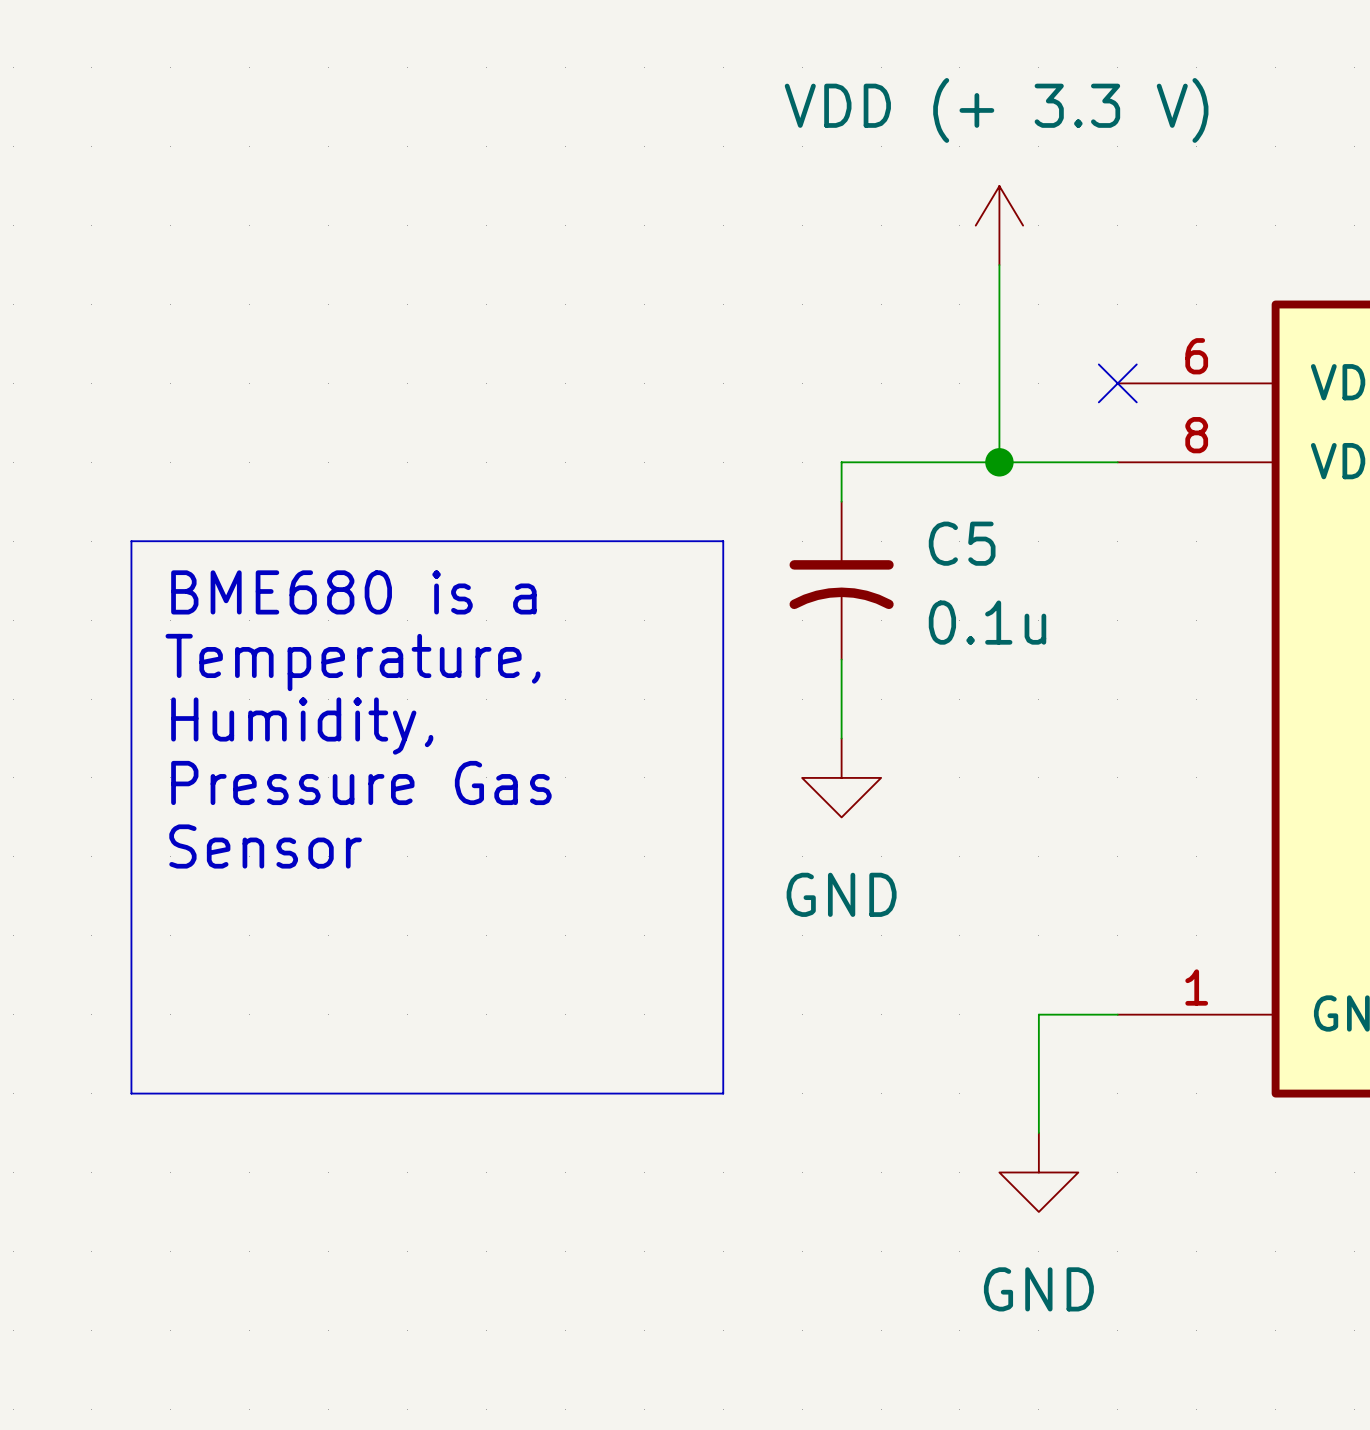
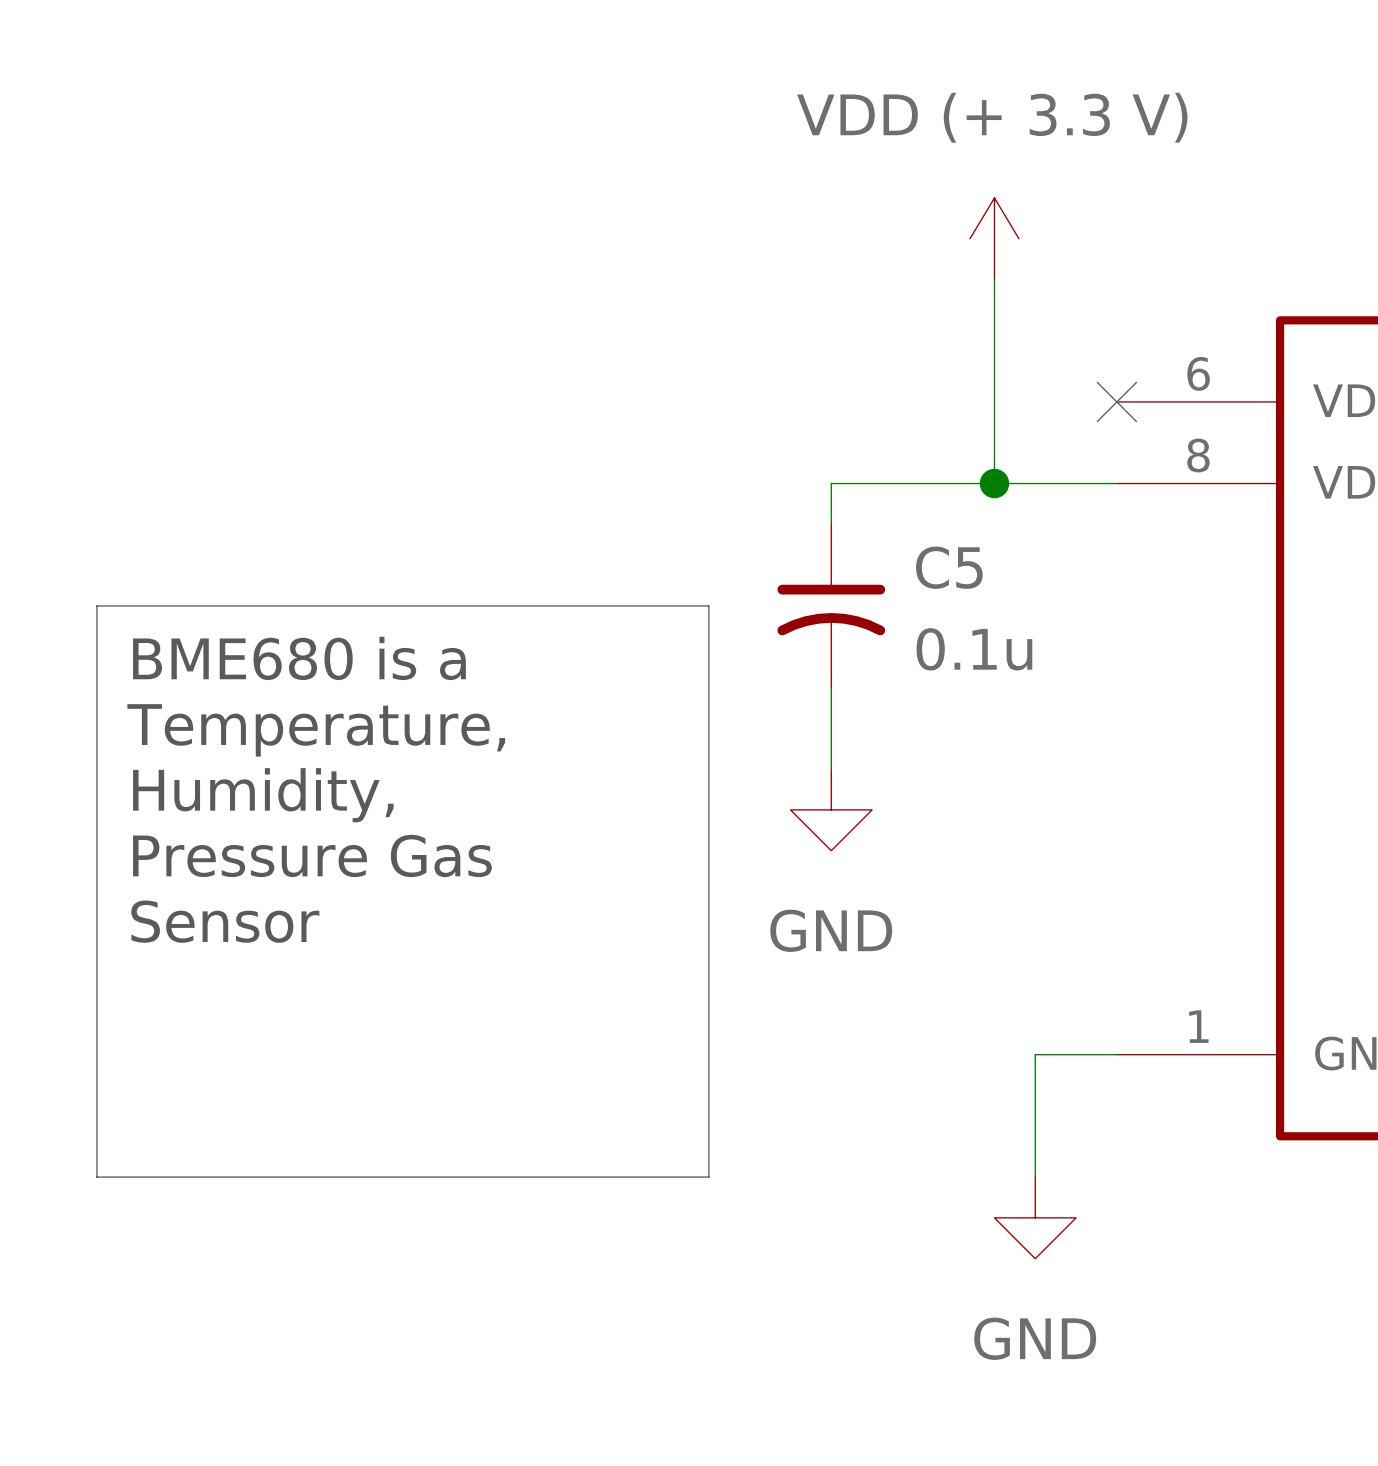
line: (131, 580) (131, 541) (723, 541) (723, 580) -> (96, 605) (708, 605)
text position: BME680 is a (353, 592) -> BME680 is a (299, 658)
text position: Temperature, (352, 662) -> Temperature, (316, 730)
text position: Humidity, (302, 726) -> Humidity, (263, 795)
text position: Pressure Gas (361, 782) -> Pressure Gas (312, 855)
text position: Sensor (265, 846) -> Sensor (225, 921)
line: (131, 1093) (723, 1093) -> (96, 1136) (96, 1177) (708, 1177) (708, 1136)

